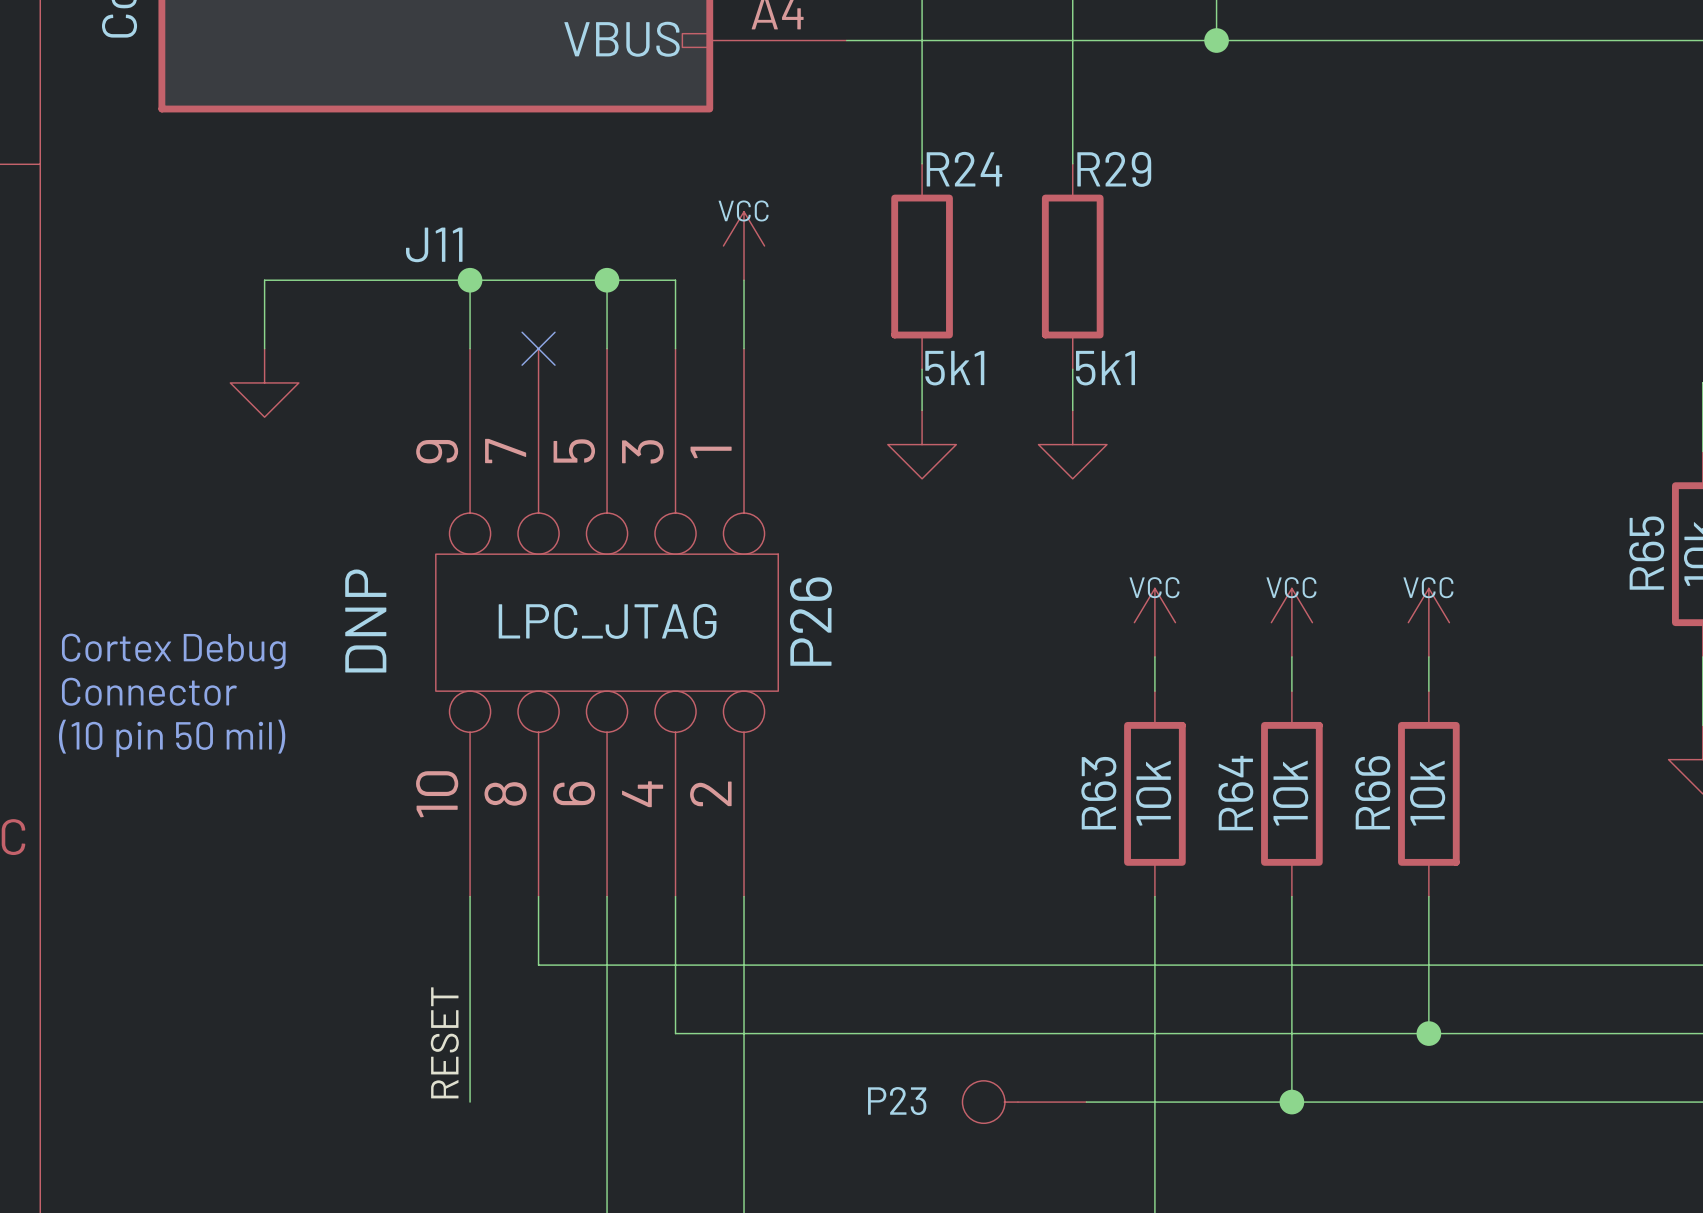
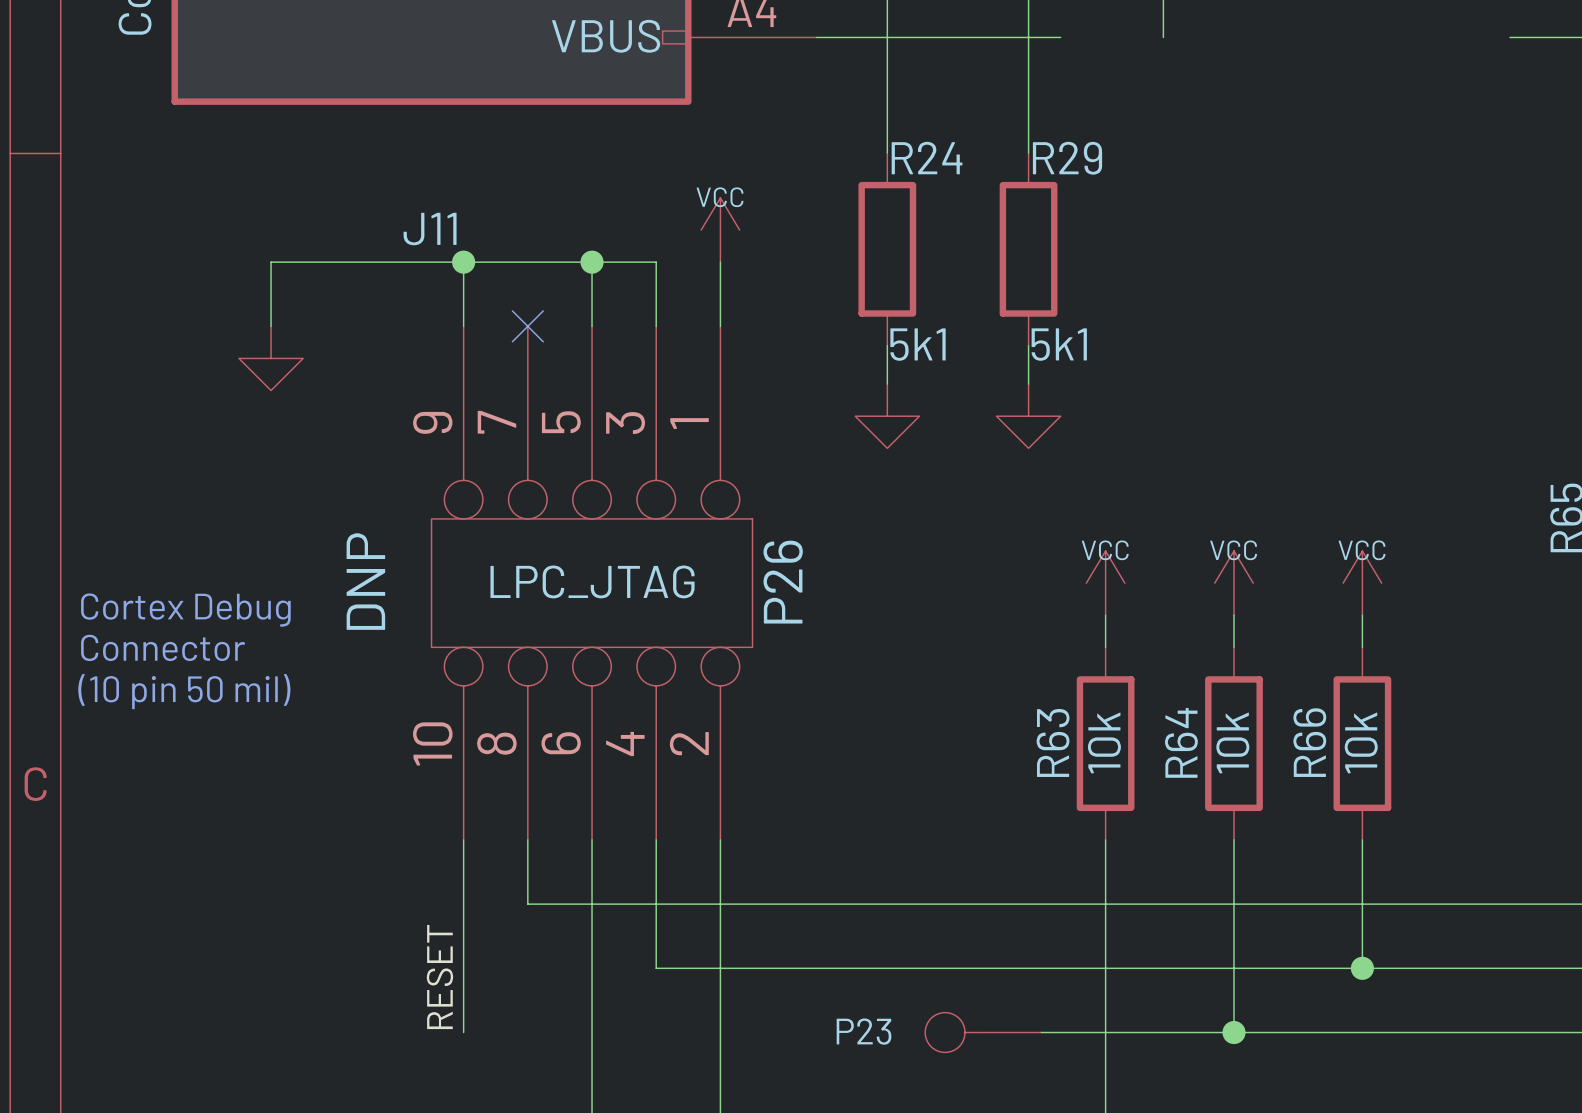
wire: (1106, 40) (1586, 40) -> none
junction: (1216, 40) -> none

